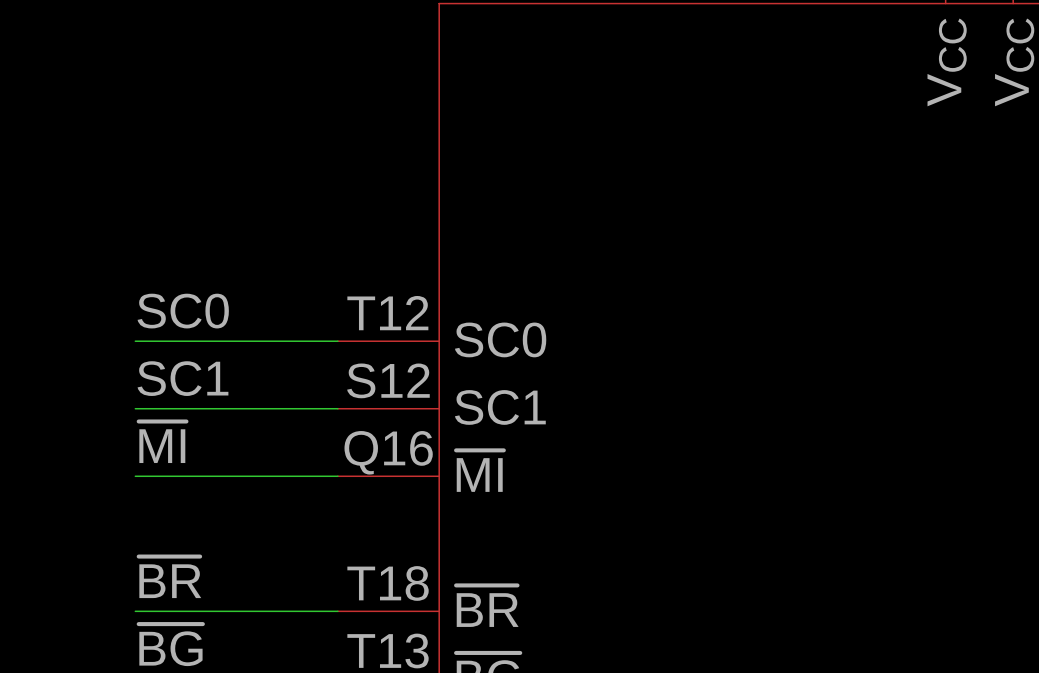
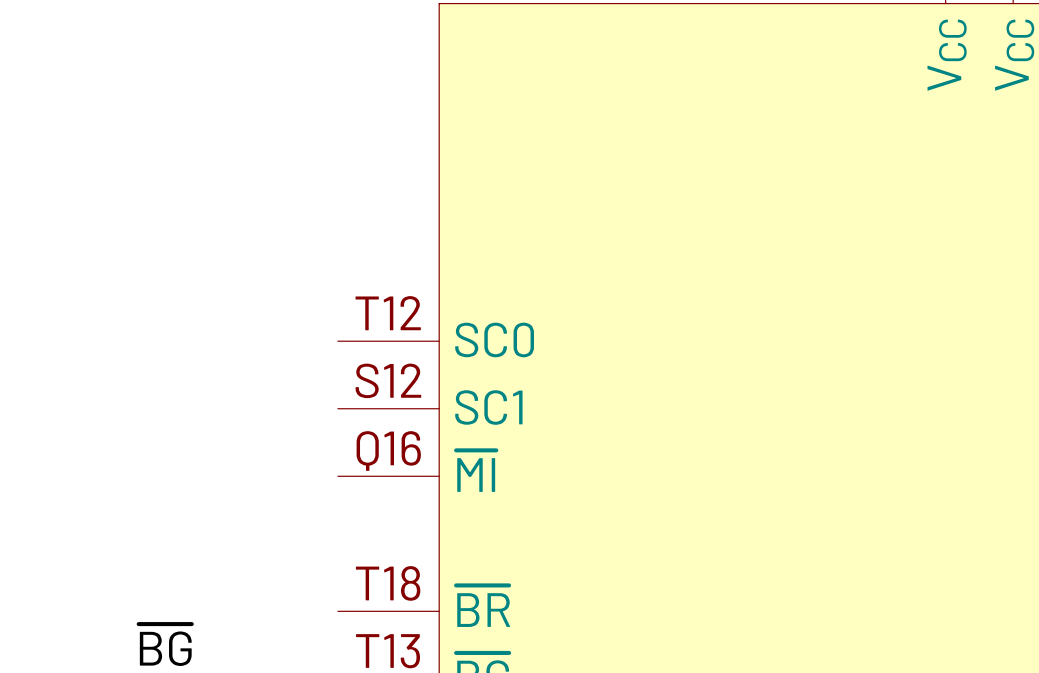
label: SC0 (183, 311) -> none
wire: (135, 341) (337, 341) -> none
label: SC1 (182, 378) -> none
wire: (135, 408) (337, 408) -> none
label: ~{MI} (162, 442) -> none
wire: (135, 476) (337, 476) -> none
label: ~{BR} (169, 577) -> none
wire: (135, 611) (337, 611) -> none

